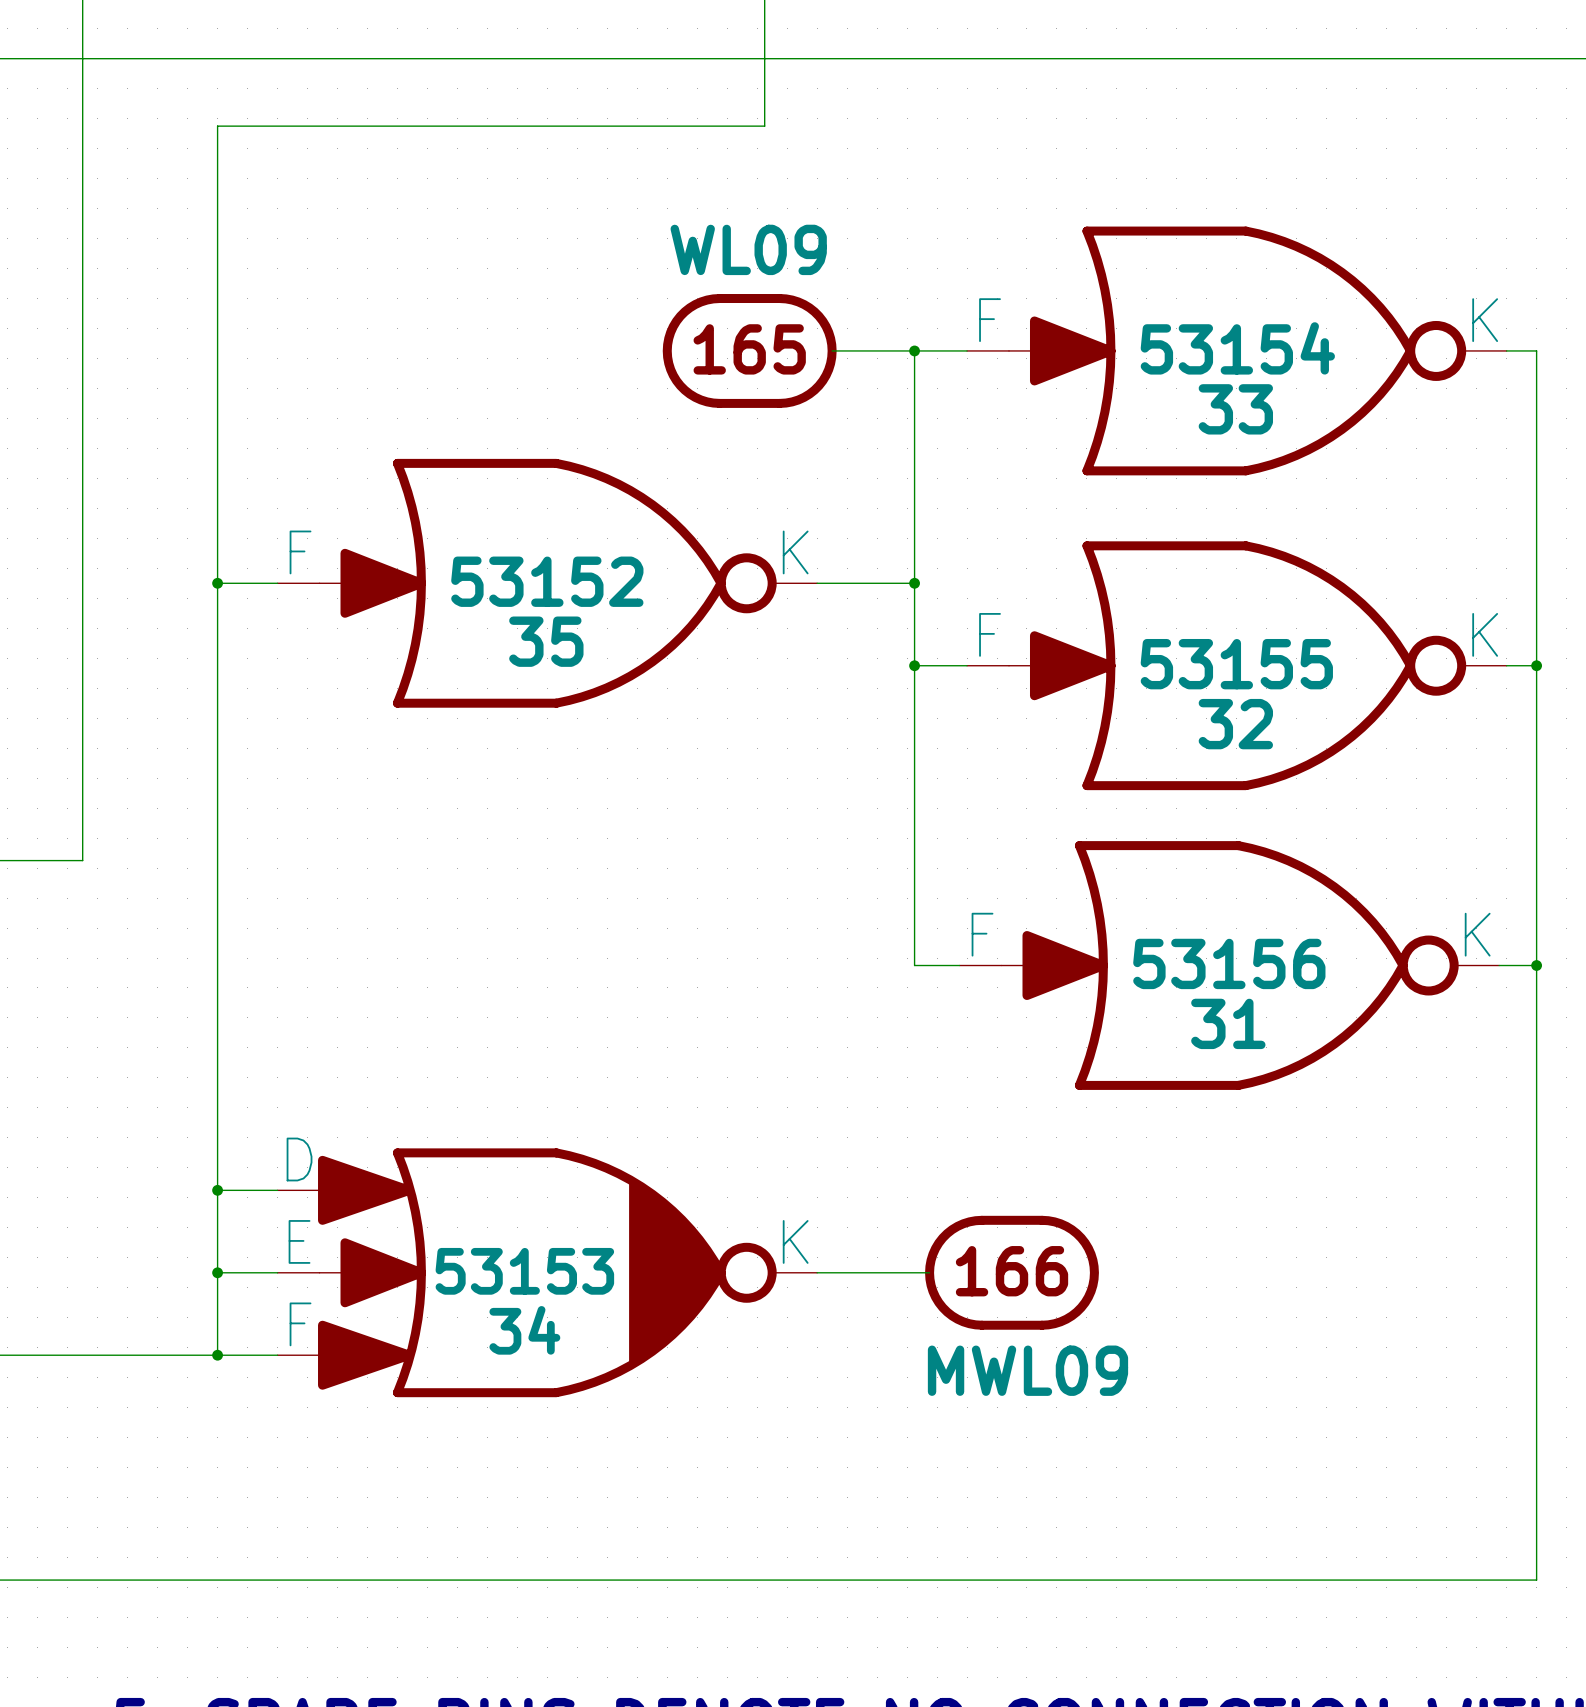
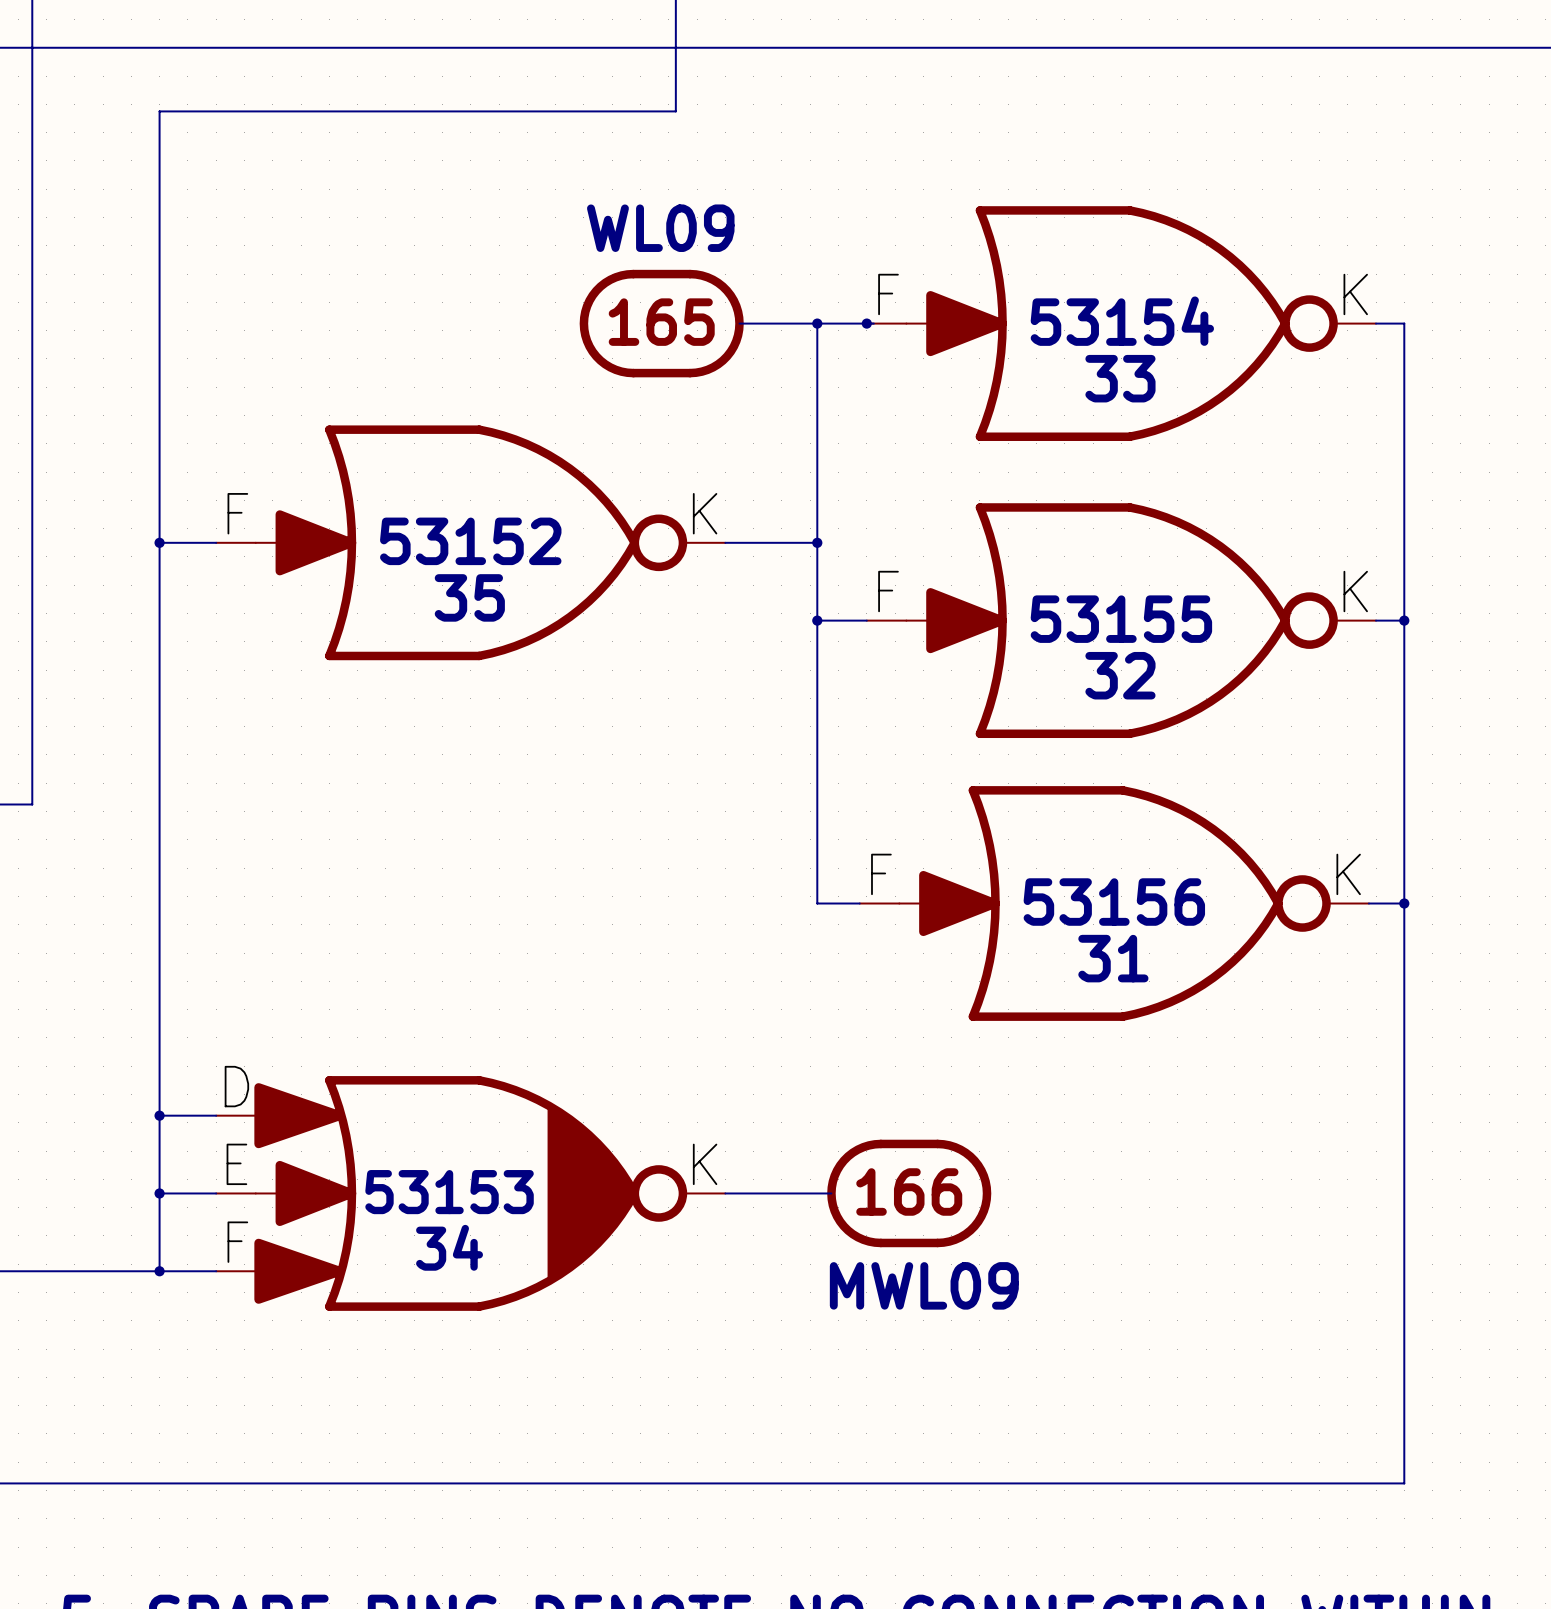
junction: none -> (866, 323)

